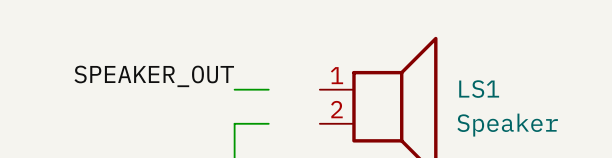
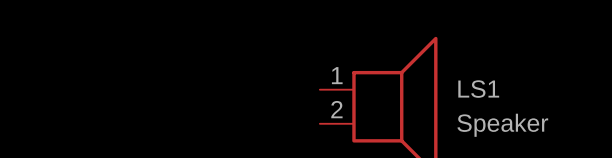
label: SPEAKER_OUT (154, 76) -> none
wire: (234, 89) (268, 89) -> none
wire: (268, 123) (234, 123) (234, 157) -> none

